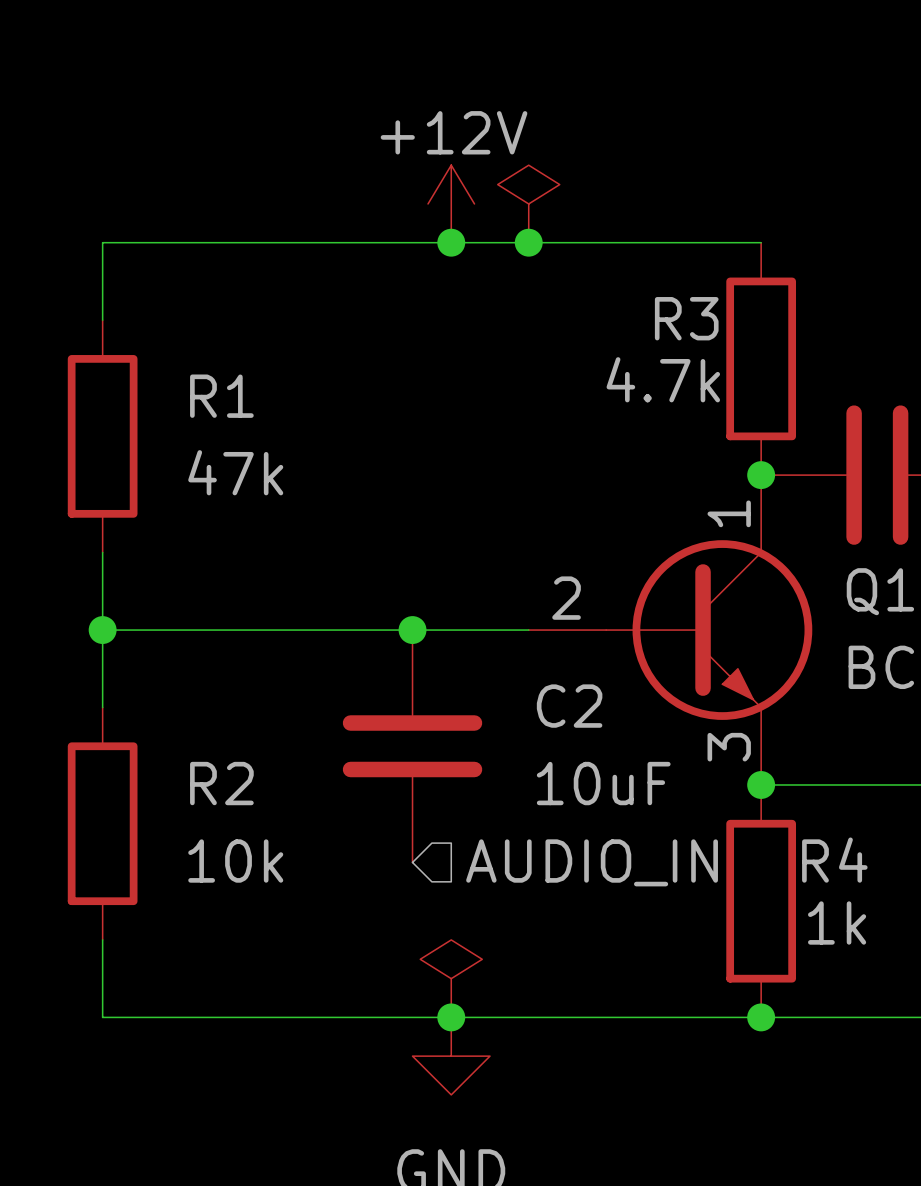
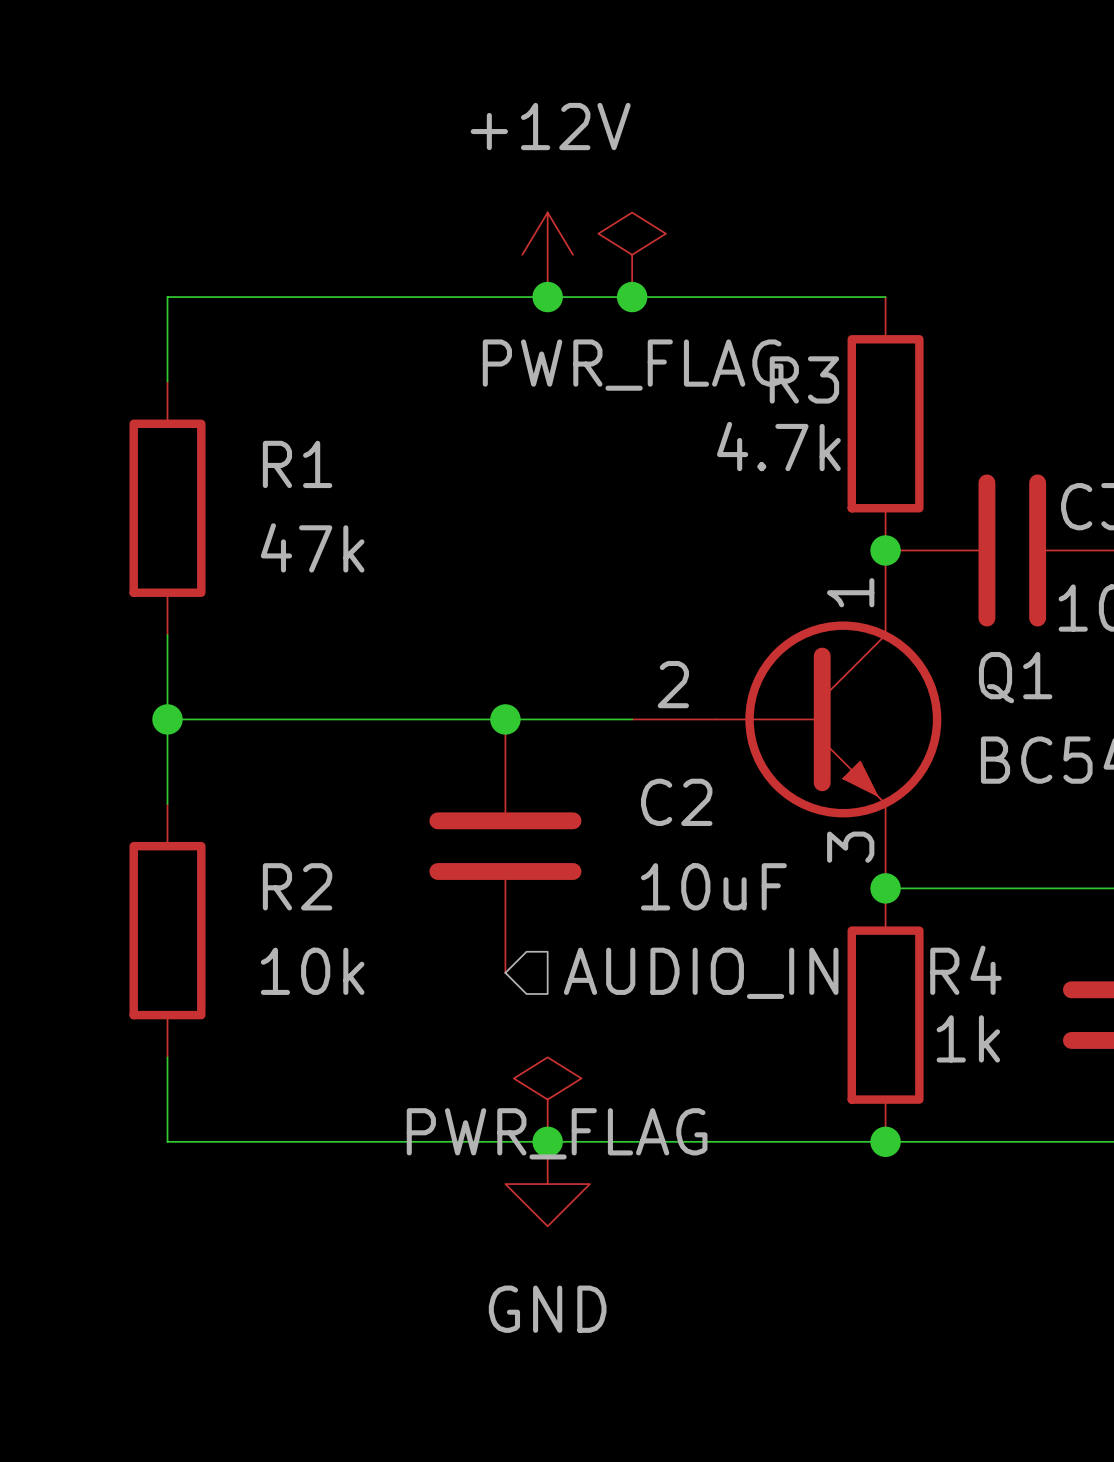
power symbol text position: +12V (454, 132) -> +12V (550, 126)
power symbol text: none -> PWR_FLAG (633, 365)
power symbol text: none -> PWR_FLAG (557, 1133)

